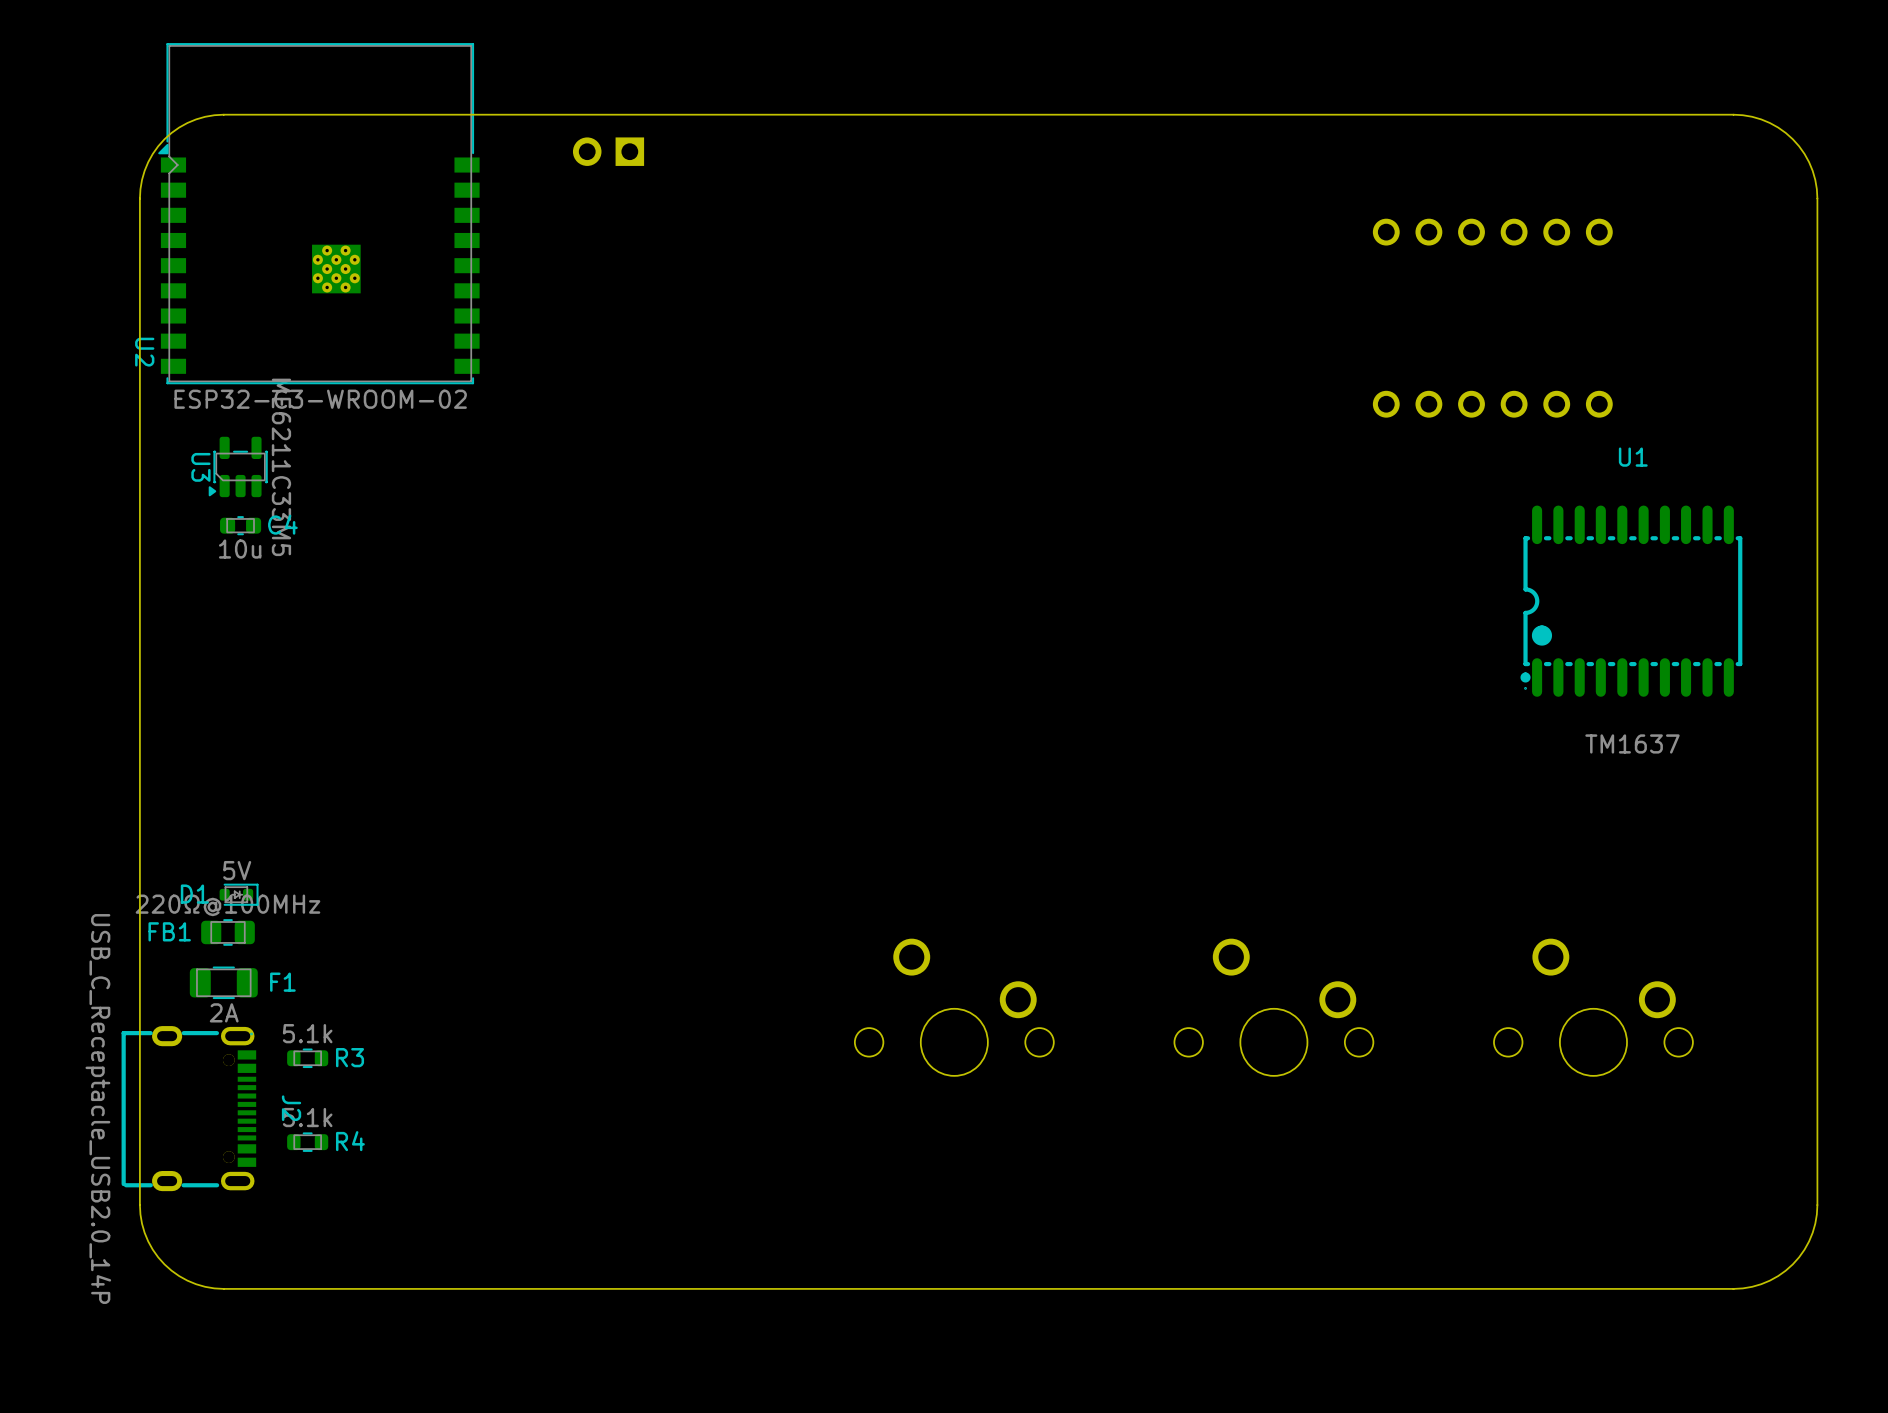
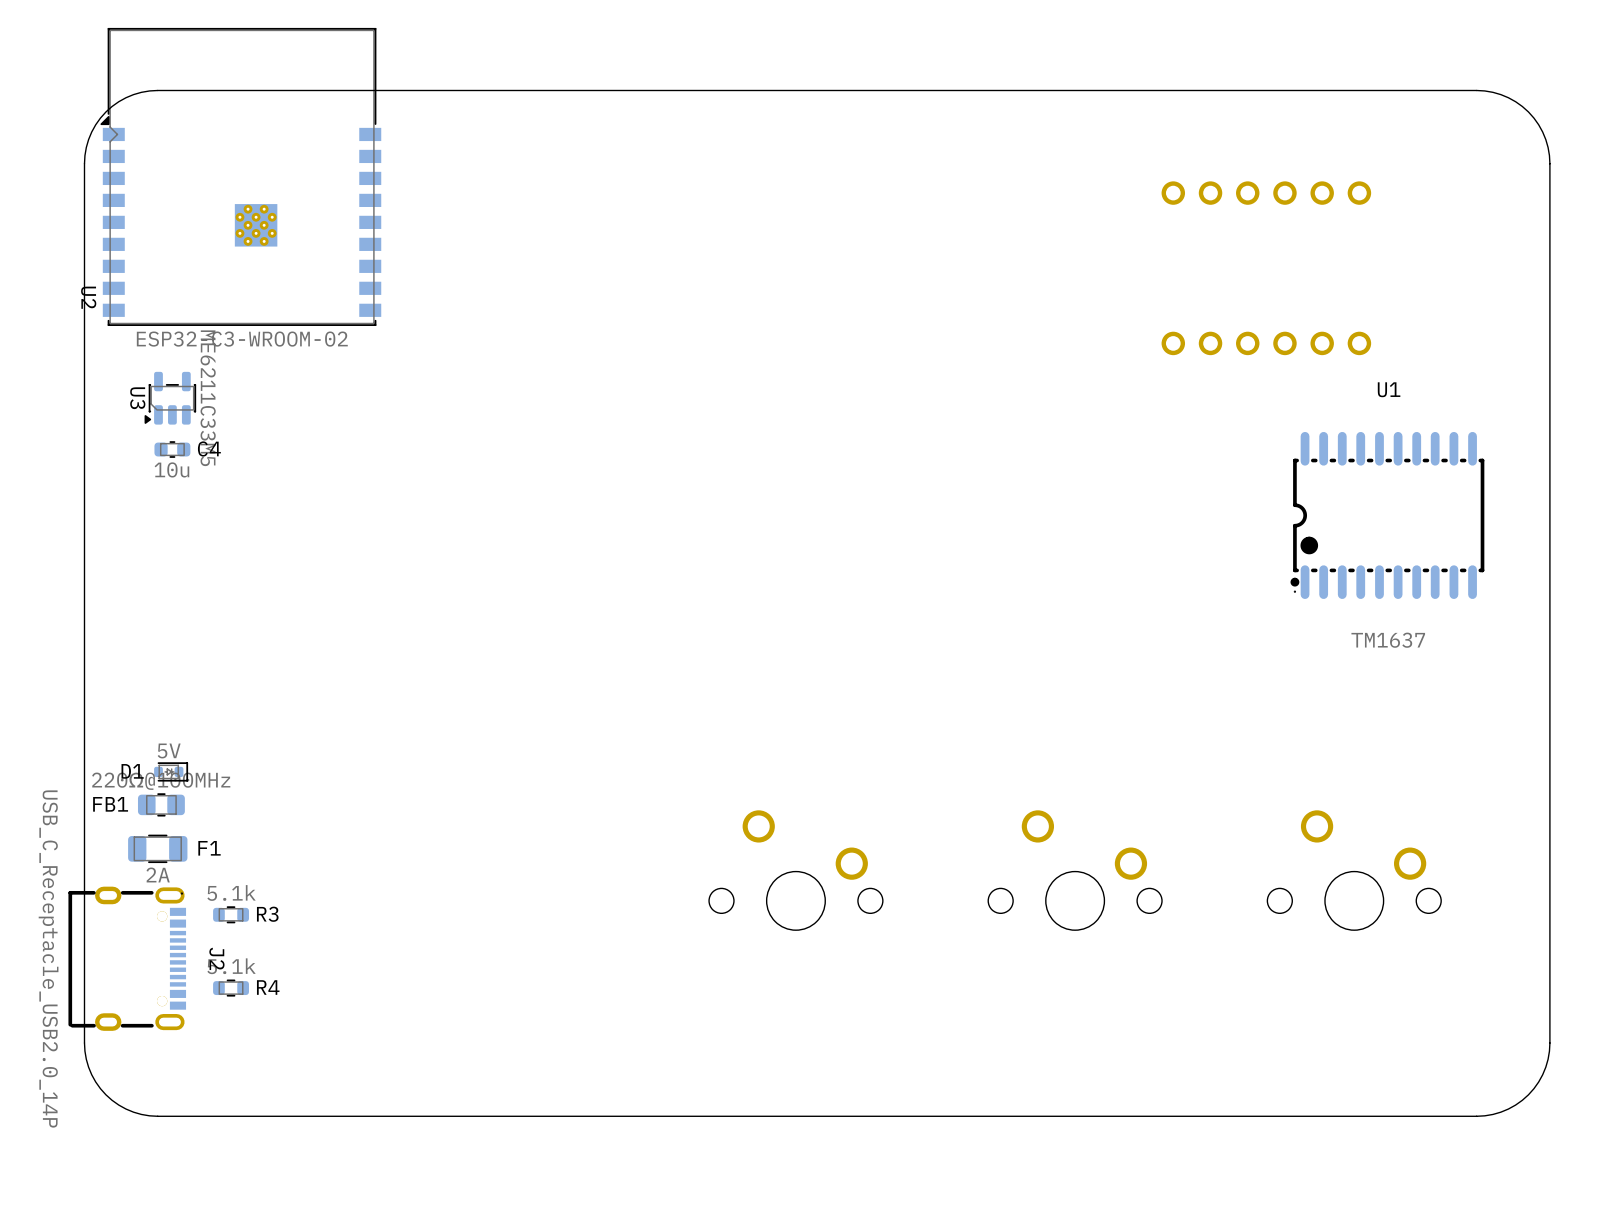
part: (608, 151) -> none

